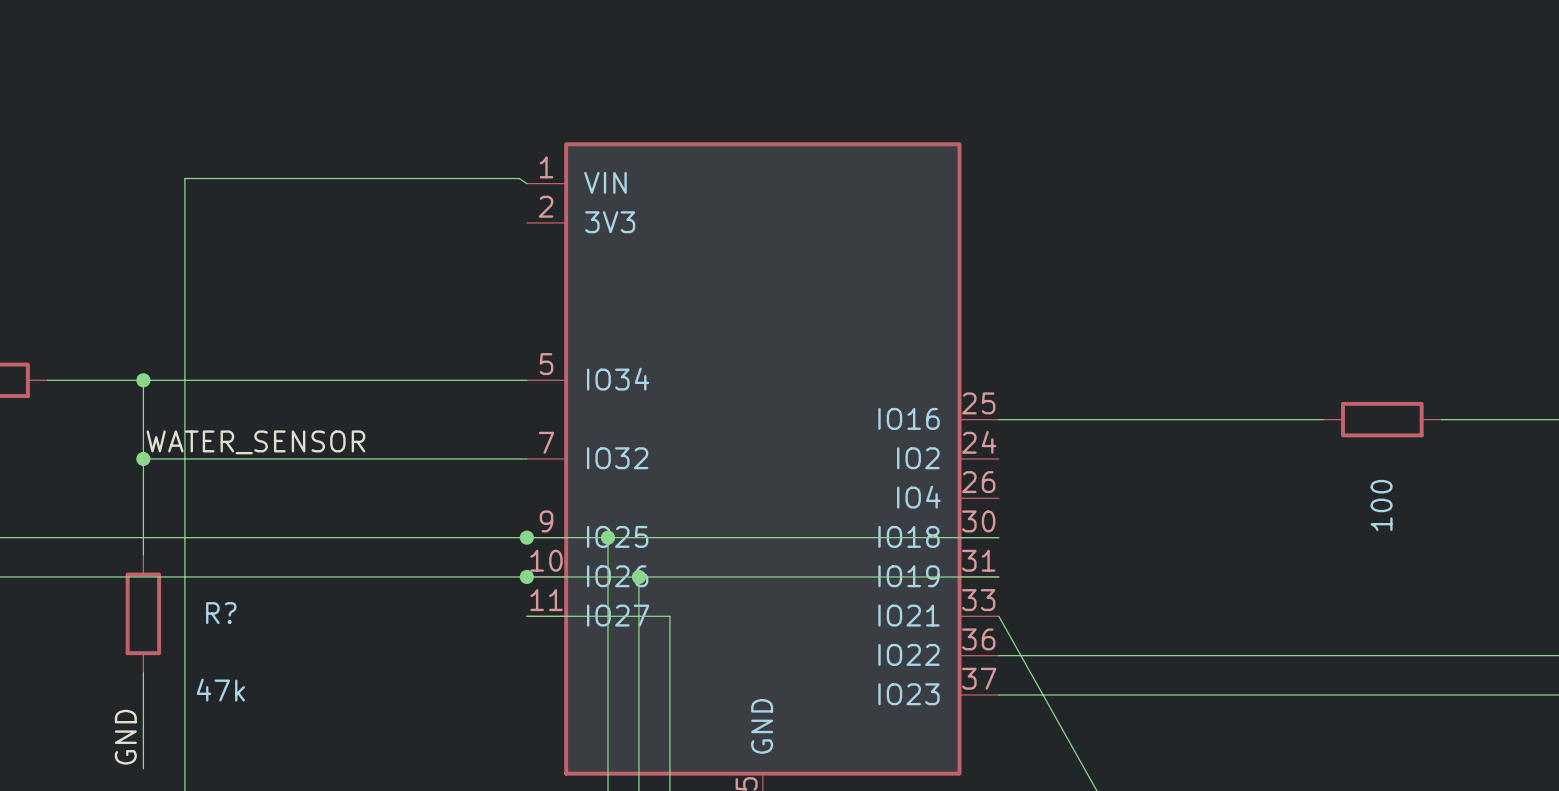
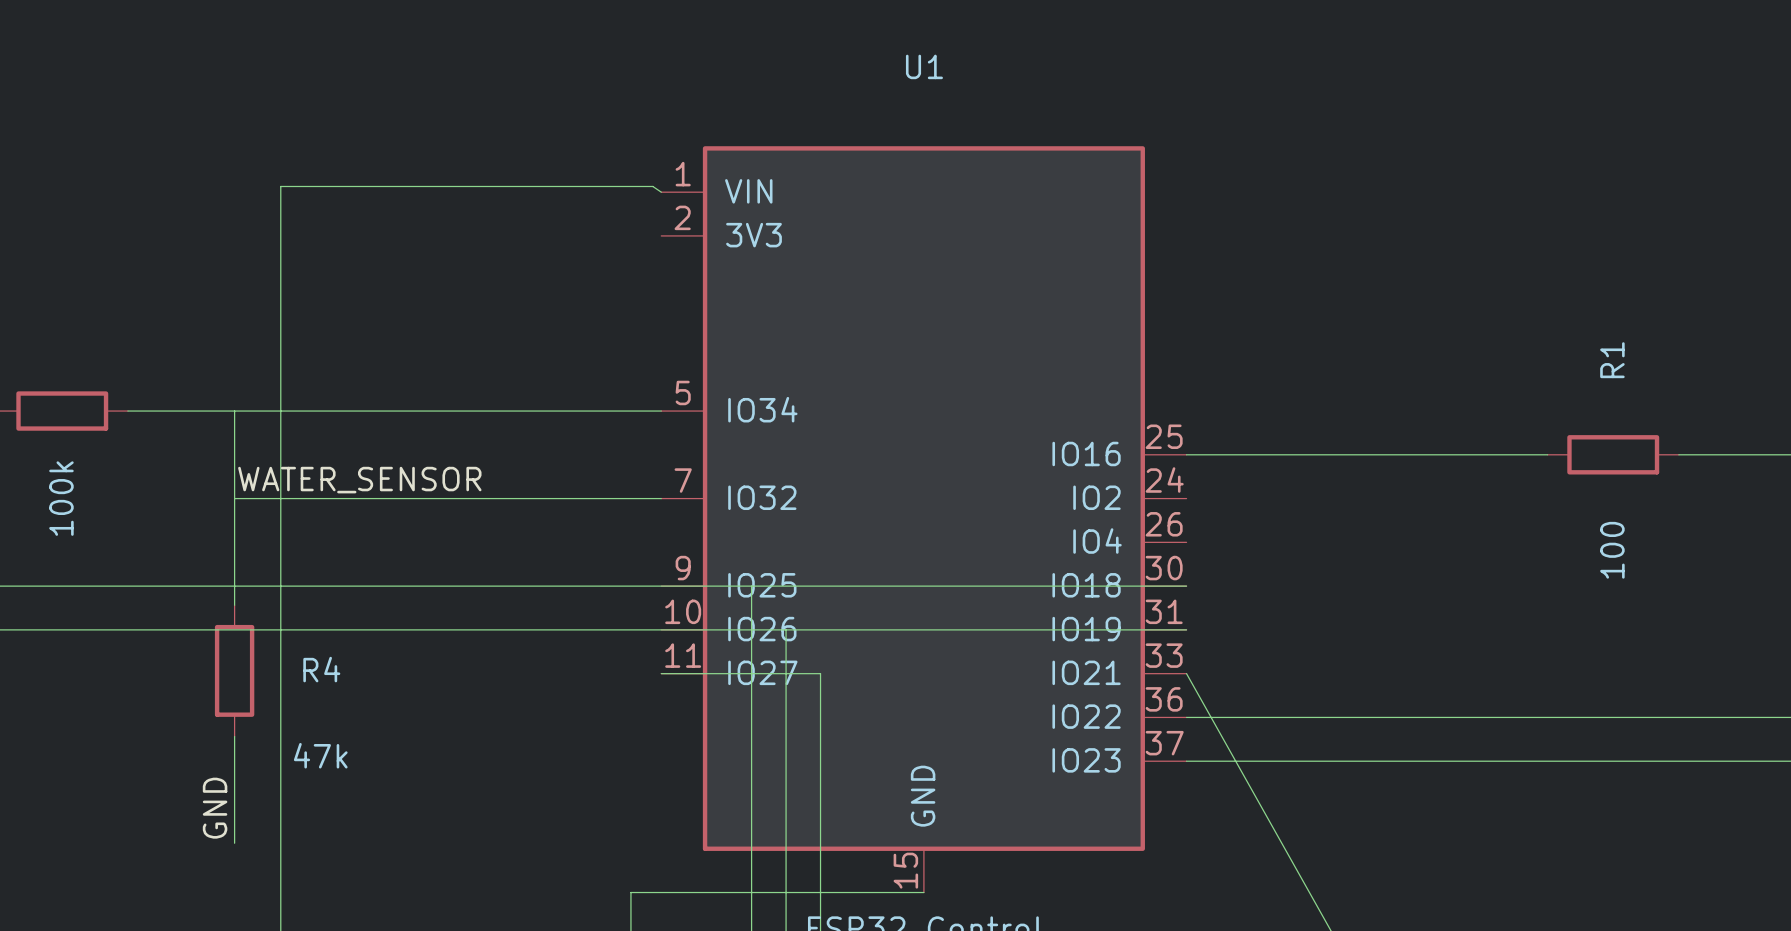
U1 name: none -> U1 (924, 66)
R1 name: none -> R1 (1612, 360)
junction: (143, 380) -> none
junction: (143, 458) -> none
junction: (526, 537) -> none
junction: (607, 537) -> none
junction: (526, 576) -> none
junction: (638, 576) -> none
R? name: R? (221, 613) -> R4 (321, 669)

